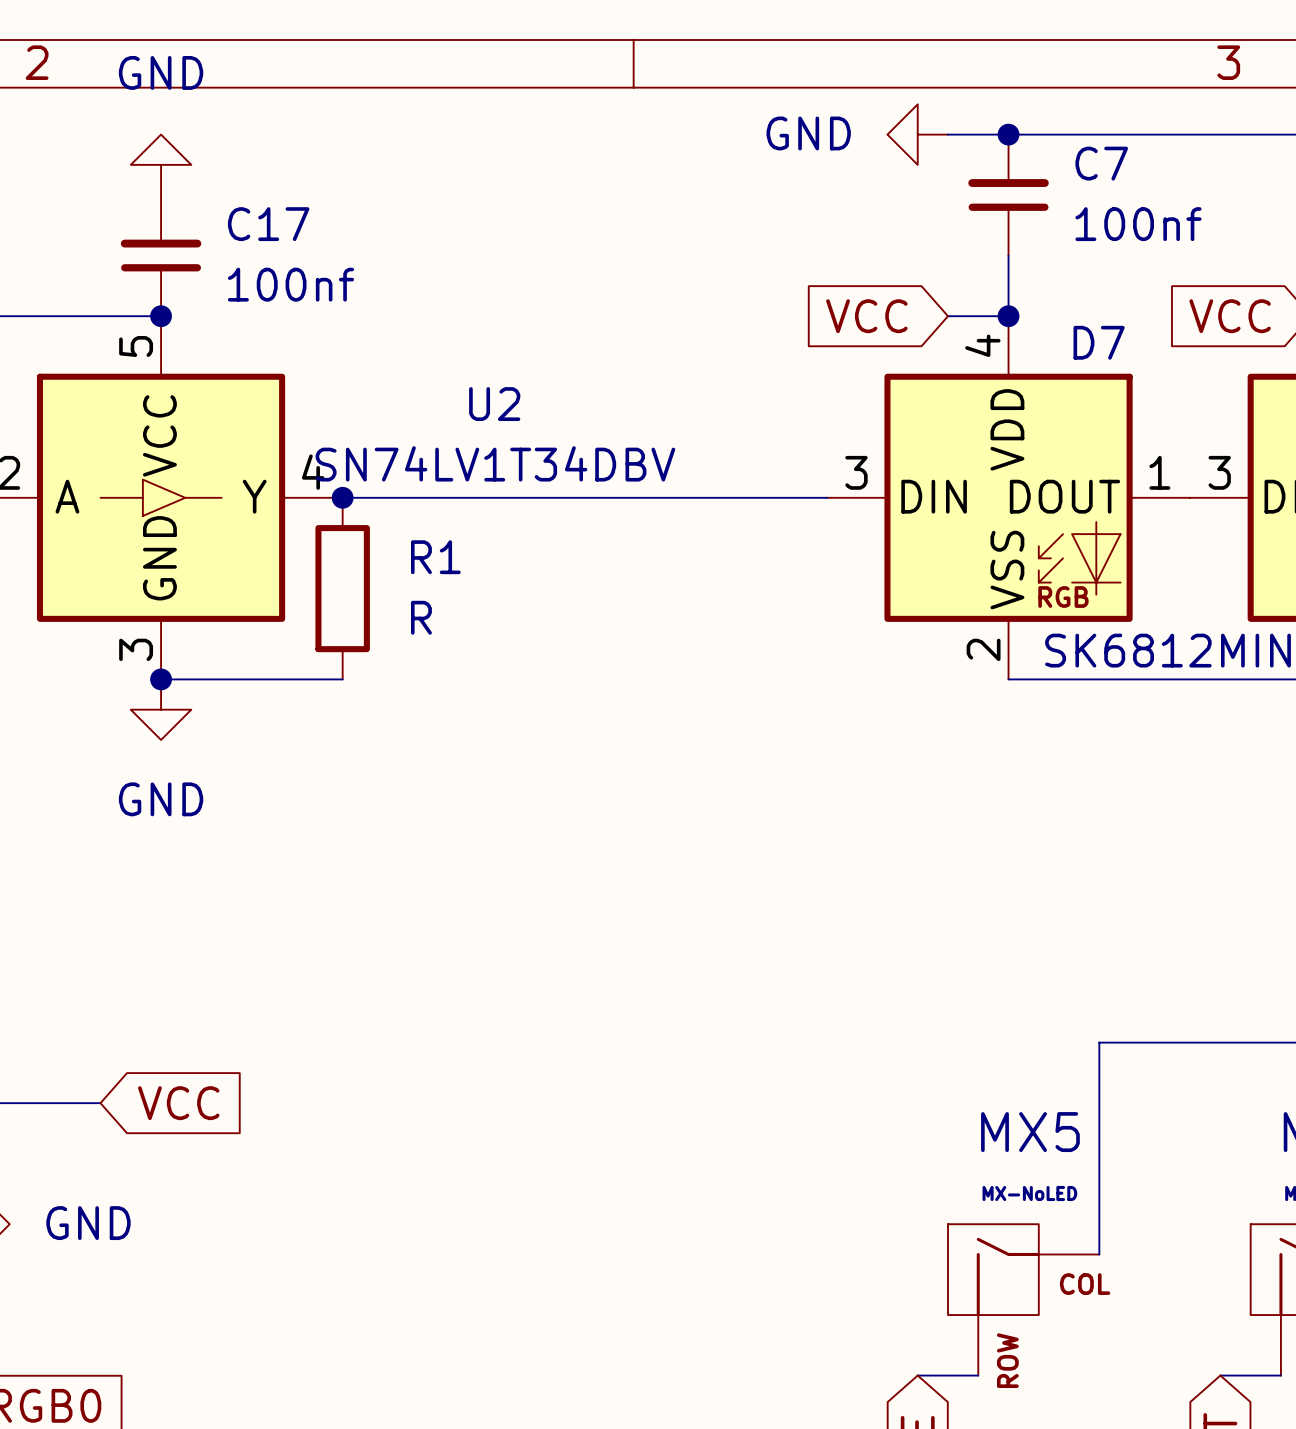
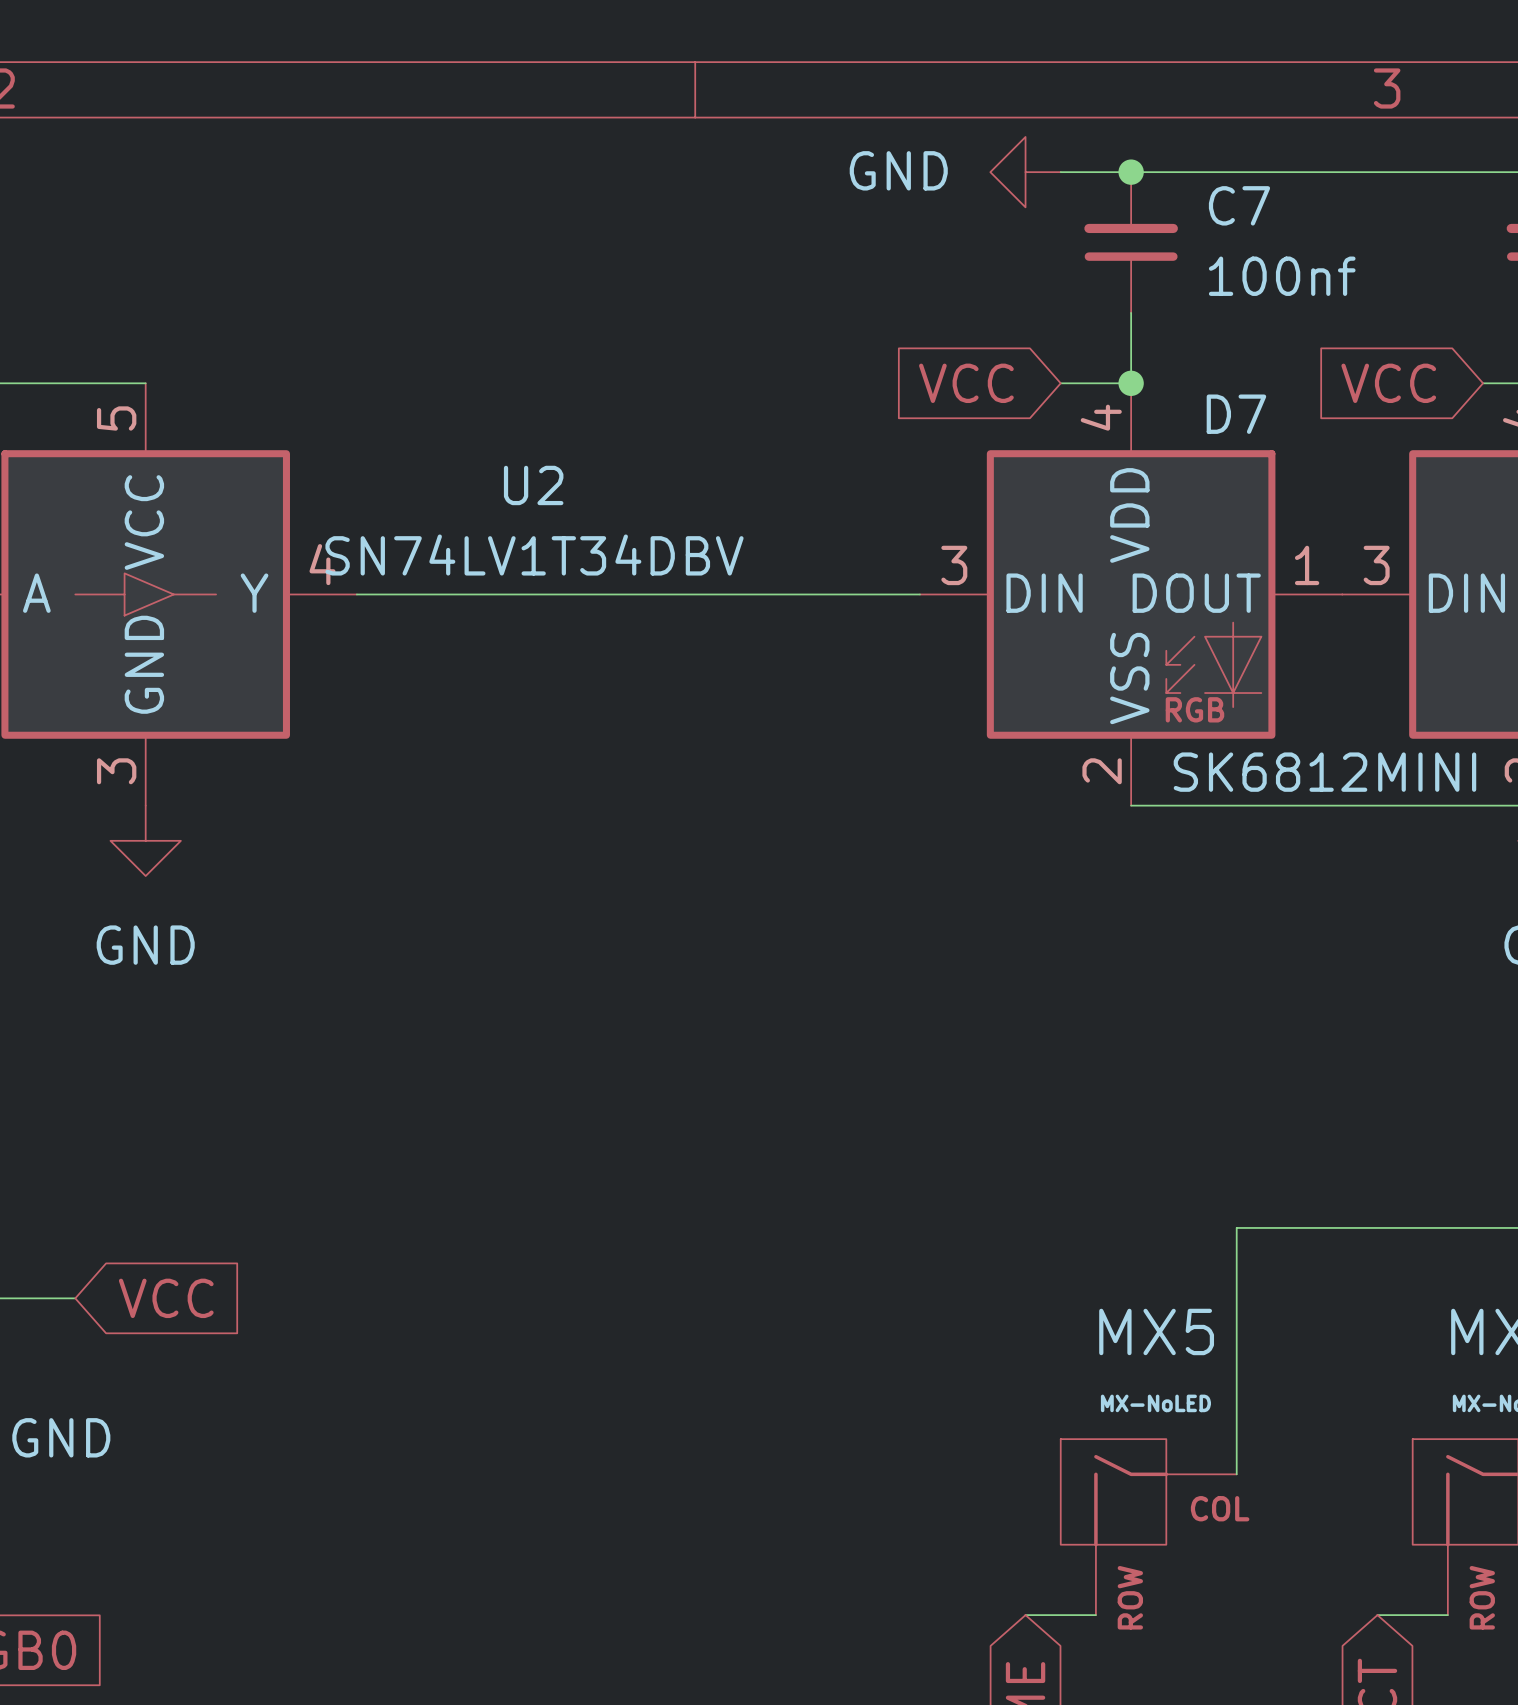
power symbol: GND (161, 164) -> none
C17: 100nf (161, 255) -> none
junction: (161, 316) -> none
junction: (342, 497) -> none
R1: R (342, 588) -> none
wire: (161, 679) (342, 679) -> none
junction: (161, 679) -> none

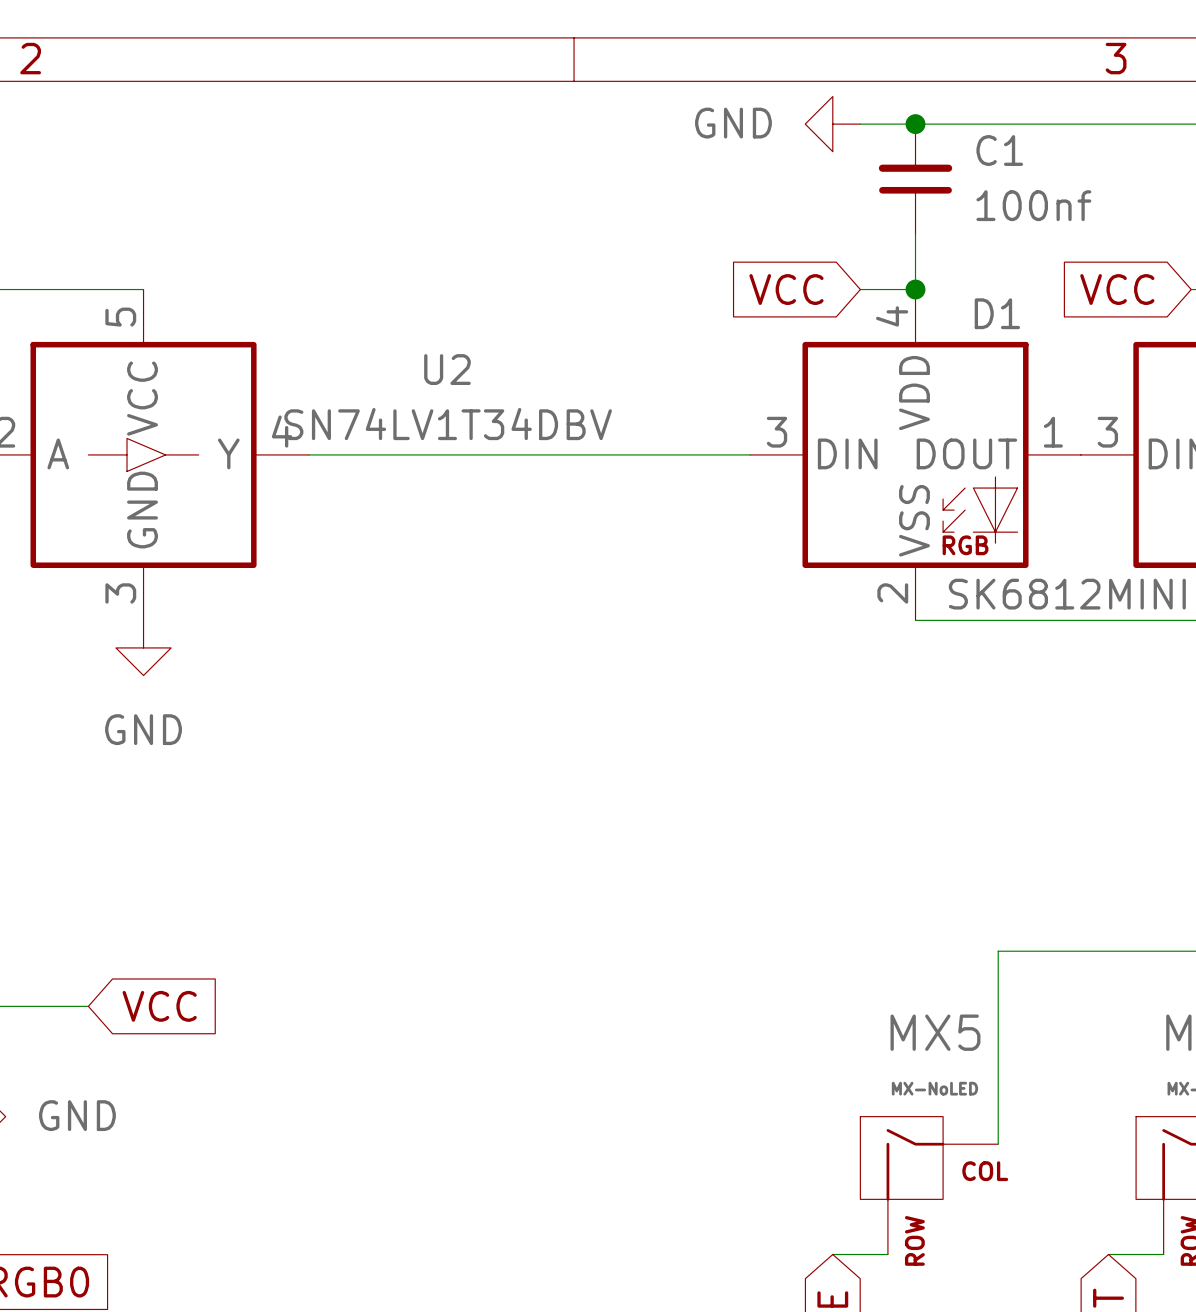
C7 name: C7 (1239, 205) -> C1 (999, 150)
D7 name: D7 (1236, 414) -> D1 (997, 313)

